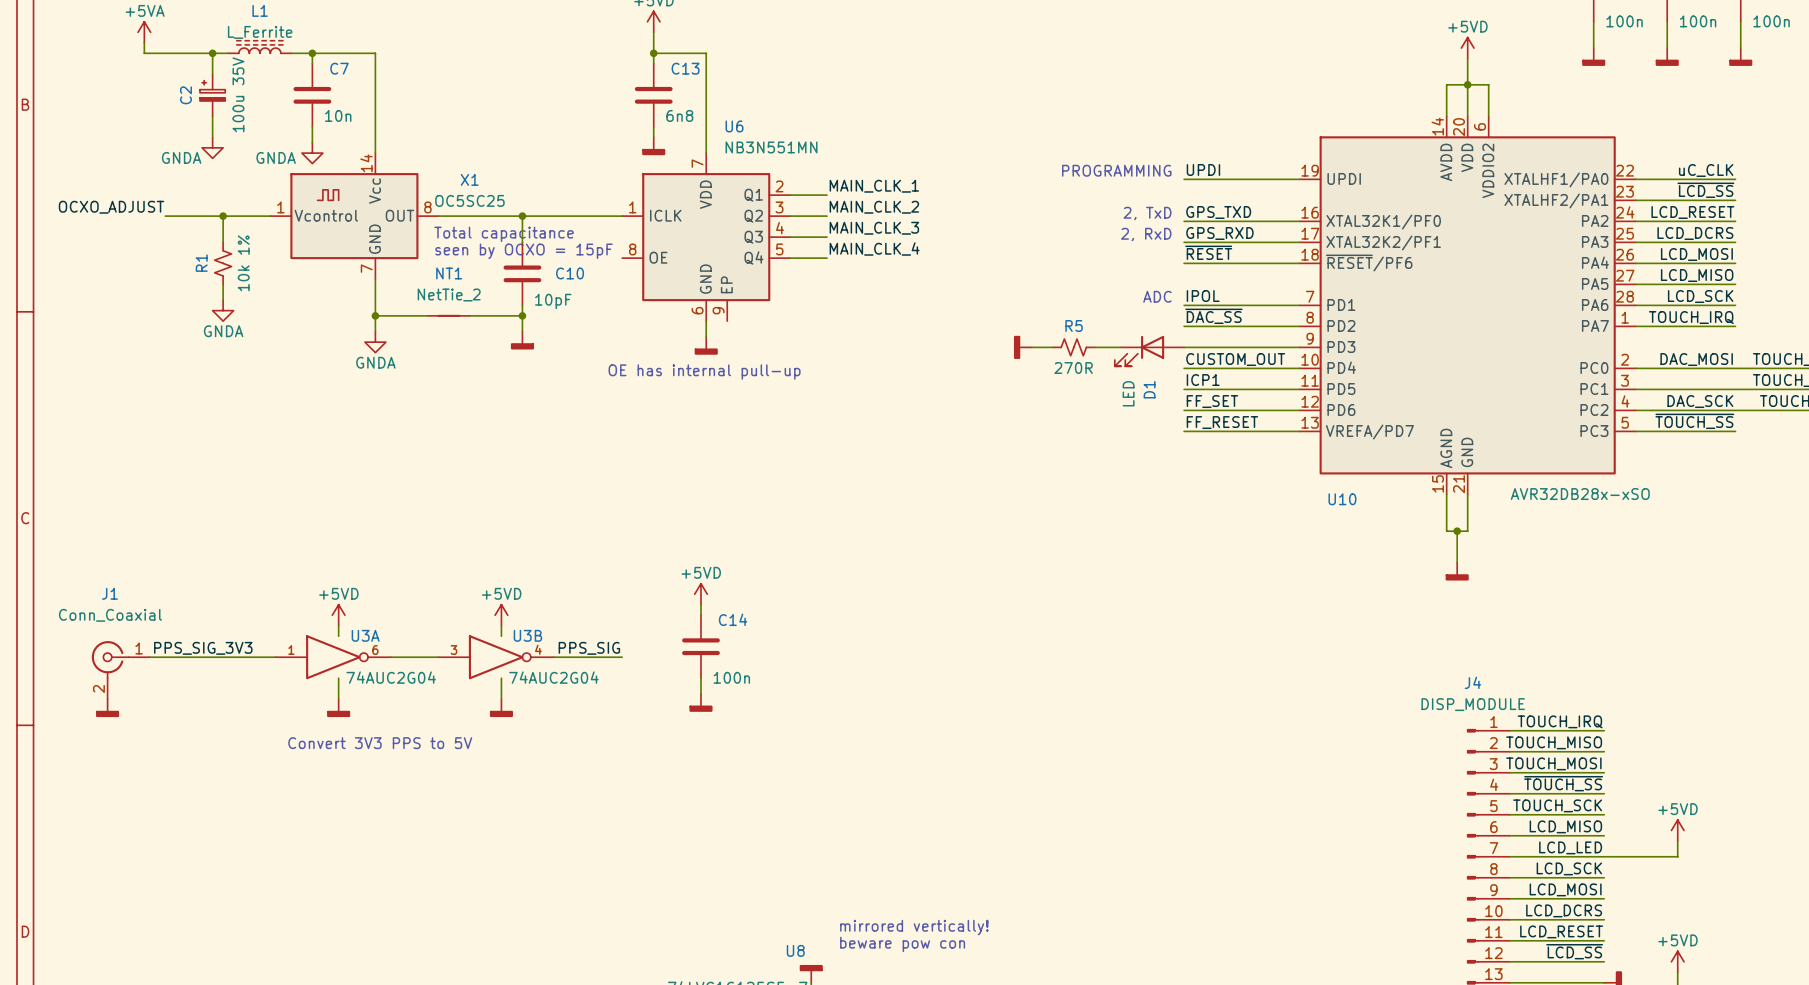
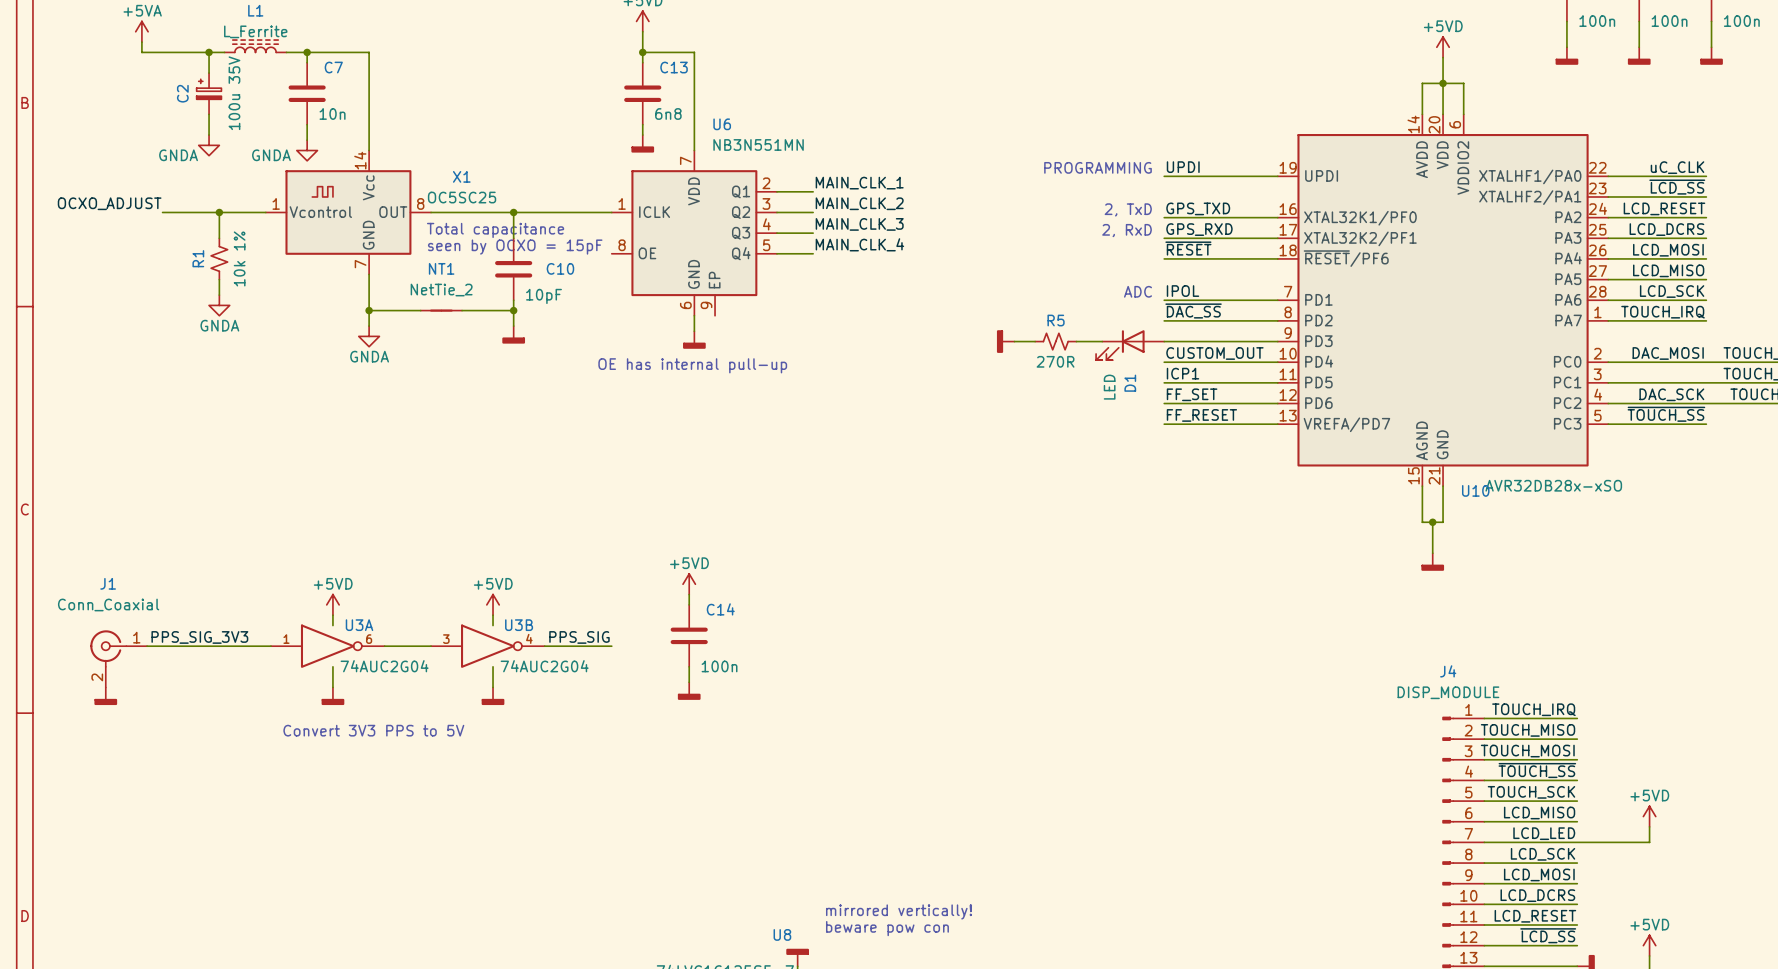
U10 name position: U10 (1342, 499) -> U10 (1475, 490)

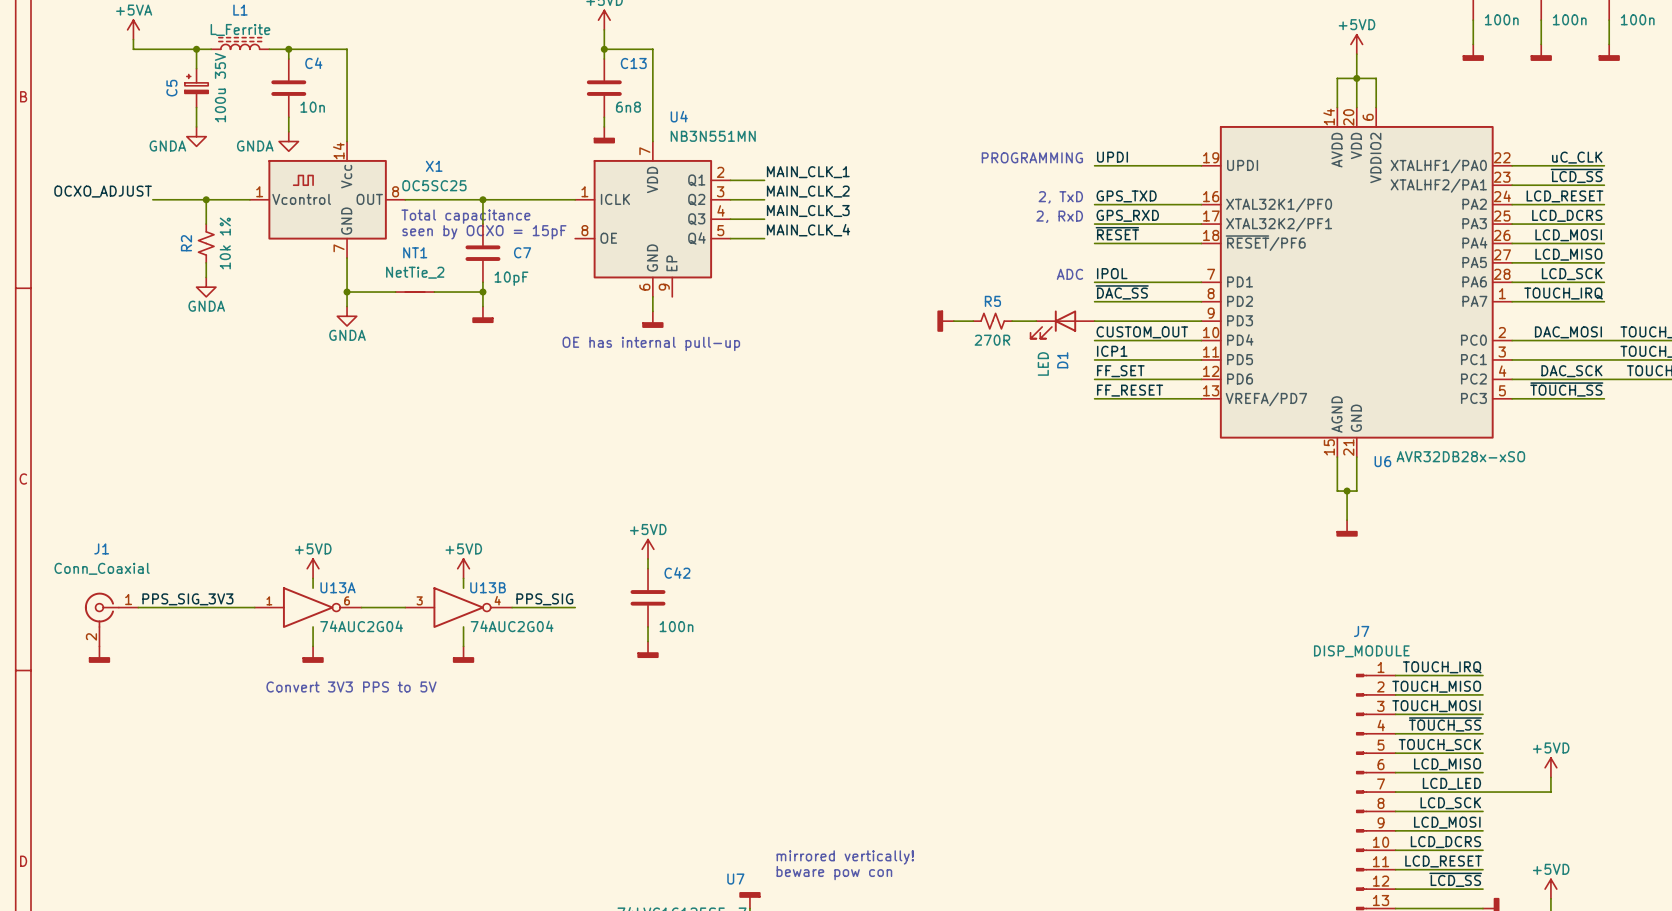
C7 name: C7 (333, 67) -> C4 (313, 63)
C2 name: C2 (182, 93) -> C5 (171, 88)
U6 name: U6 (722, 124) -> U4 (679, 116)
R1 name: R1 (198, 258) -> R2 (186, 243)
C10 name: C10 (560, 268) -> C7 (522, 252)
U10 name: U10 (1475, 490) -> U6 (1382, 461)
C14 name: C14 (720, 609) -> C42 (677, 572)
U3A name: U3A (359, 625) -> U13A (338, 587)
U3B name: U3B (519, 625) -> U13B (488, 587)
J4 name: J4 (1448, 671) -> J7 (1361, 631)
U8 name: U8 (782, 934) -> U7 (735, 879)

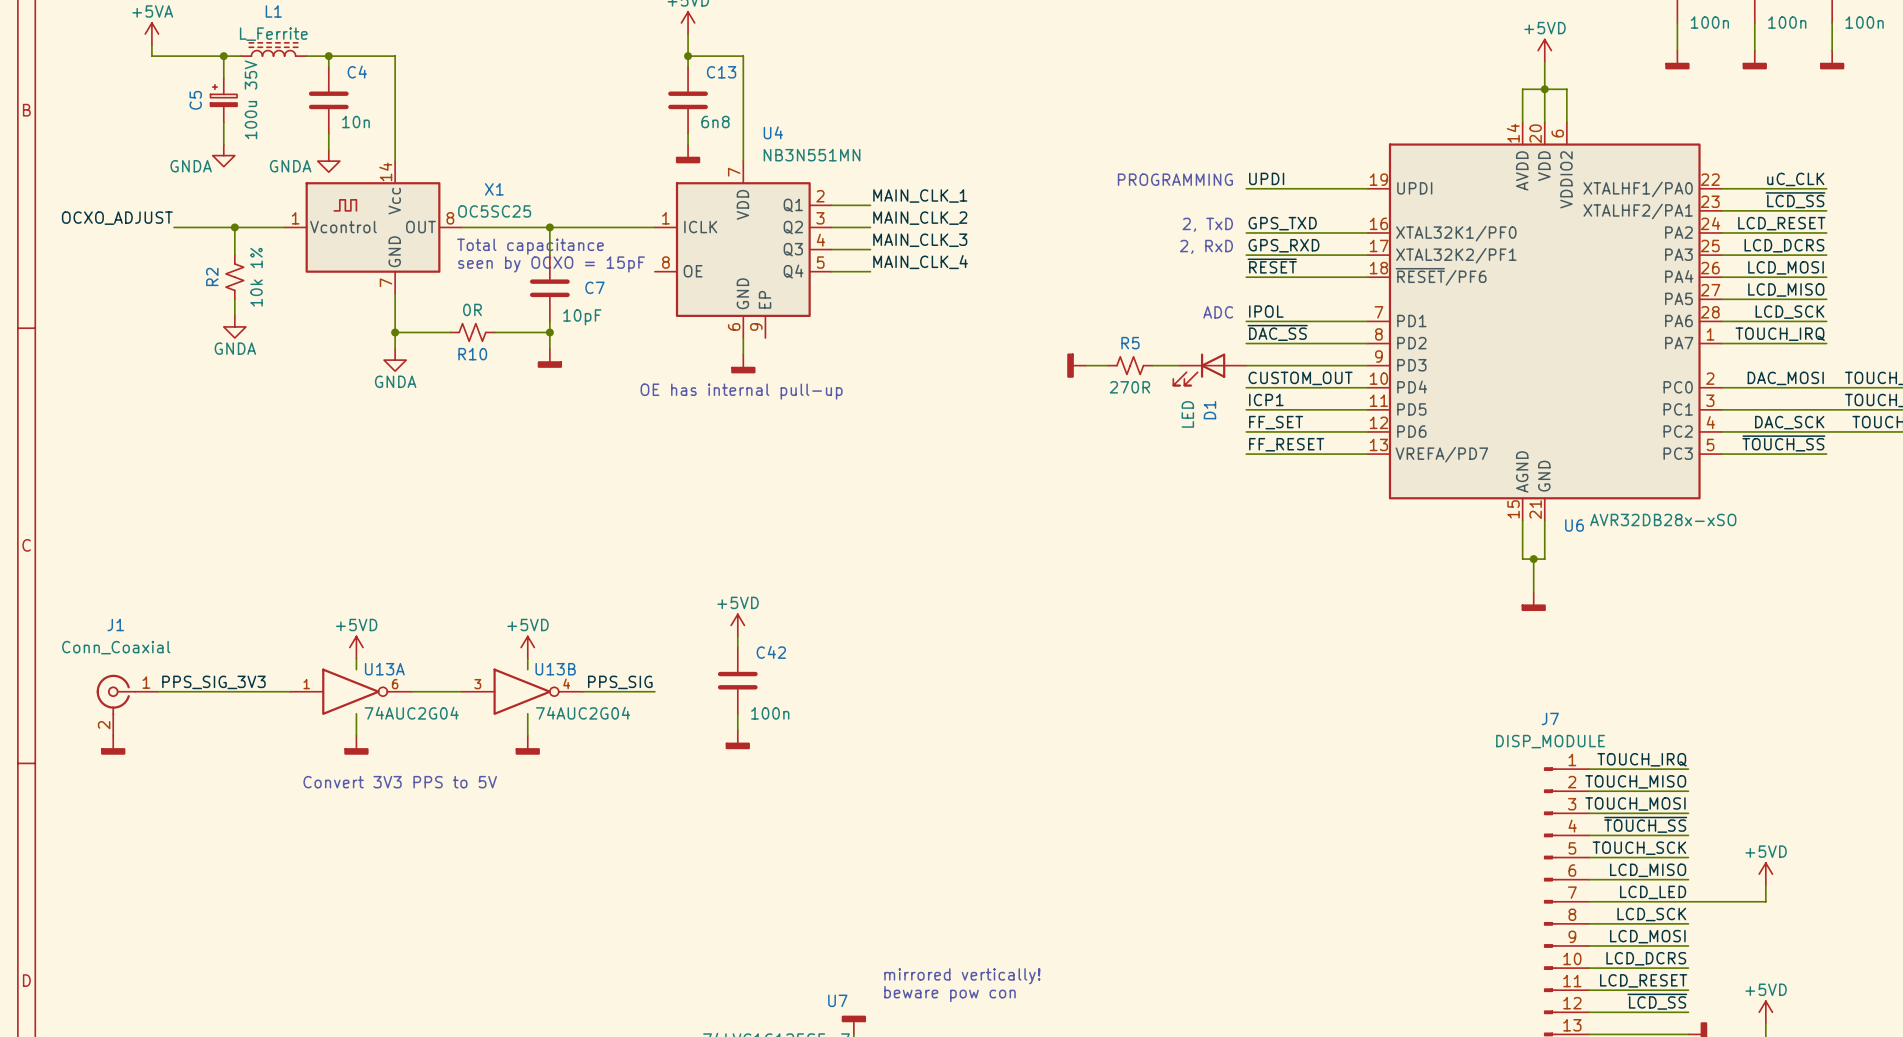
NT1: NetTie_2 (414, 292) -> none
R10: none -> 0R (472, 332)

